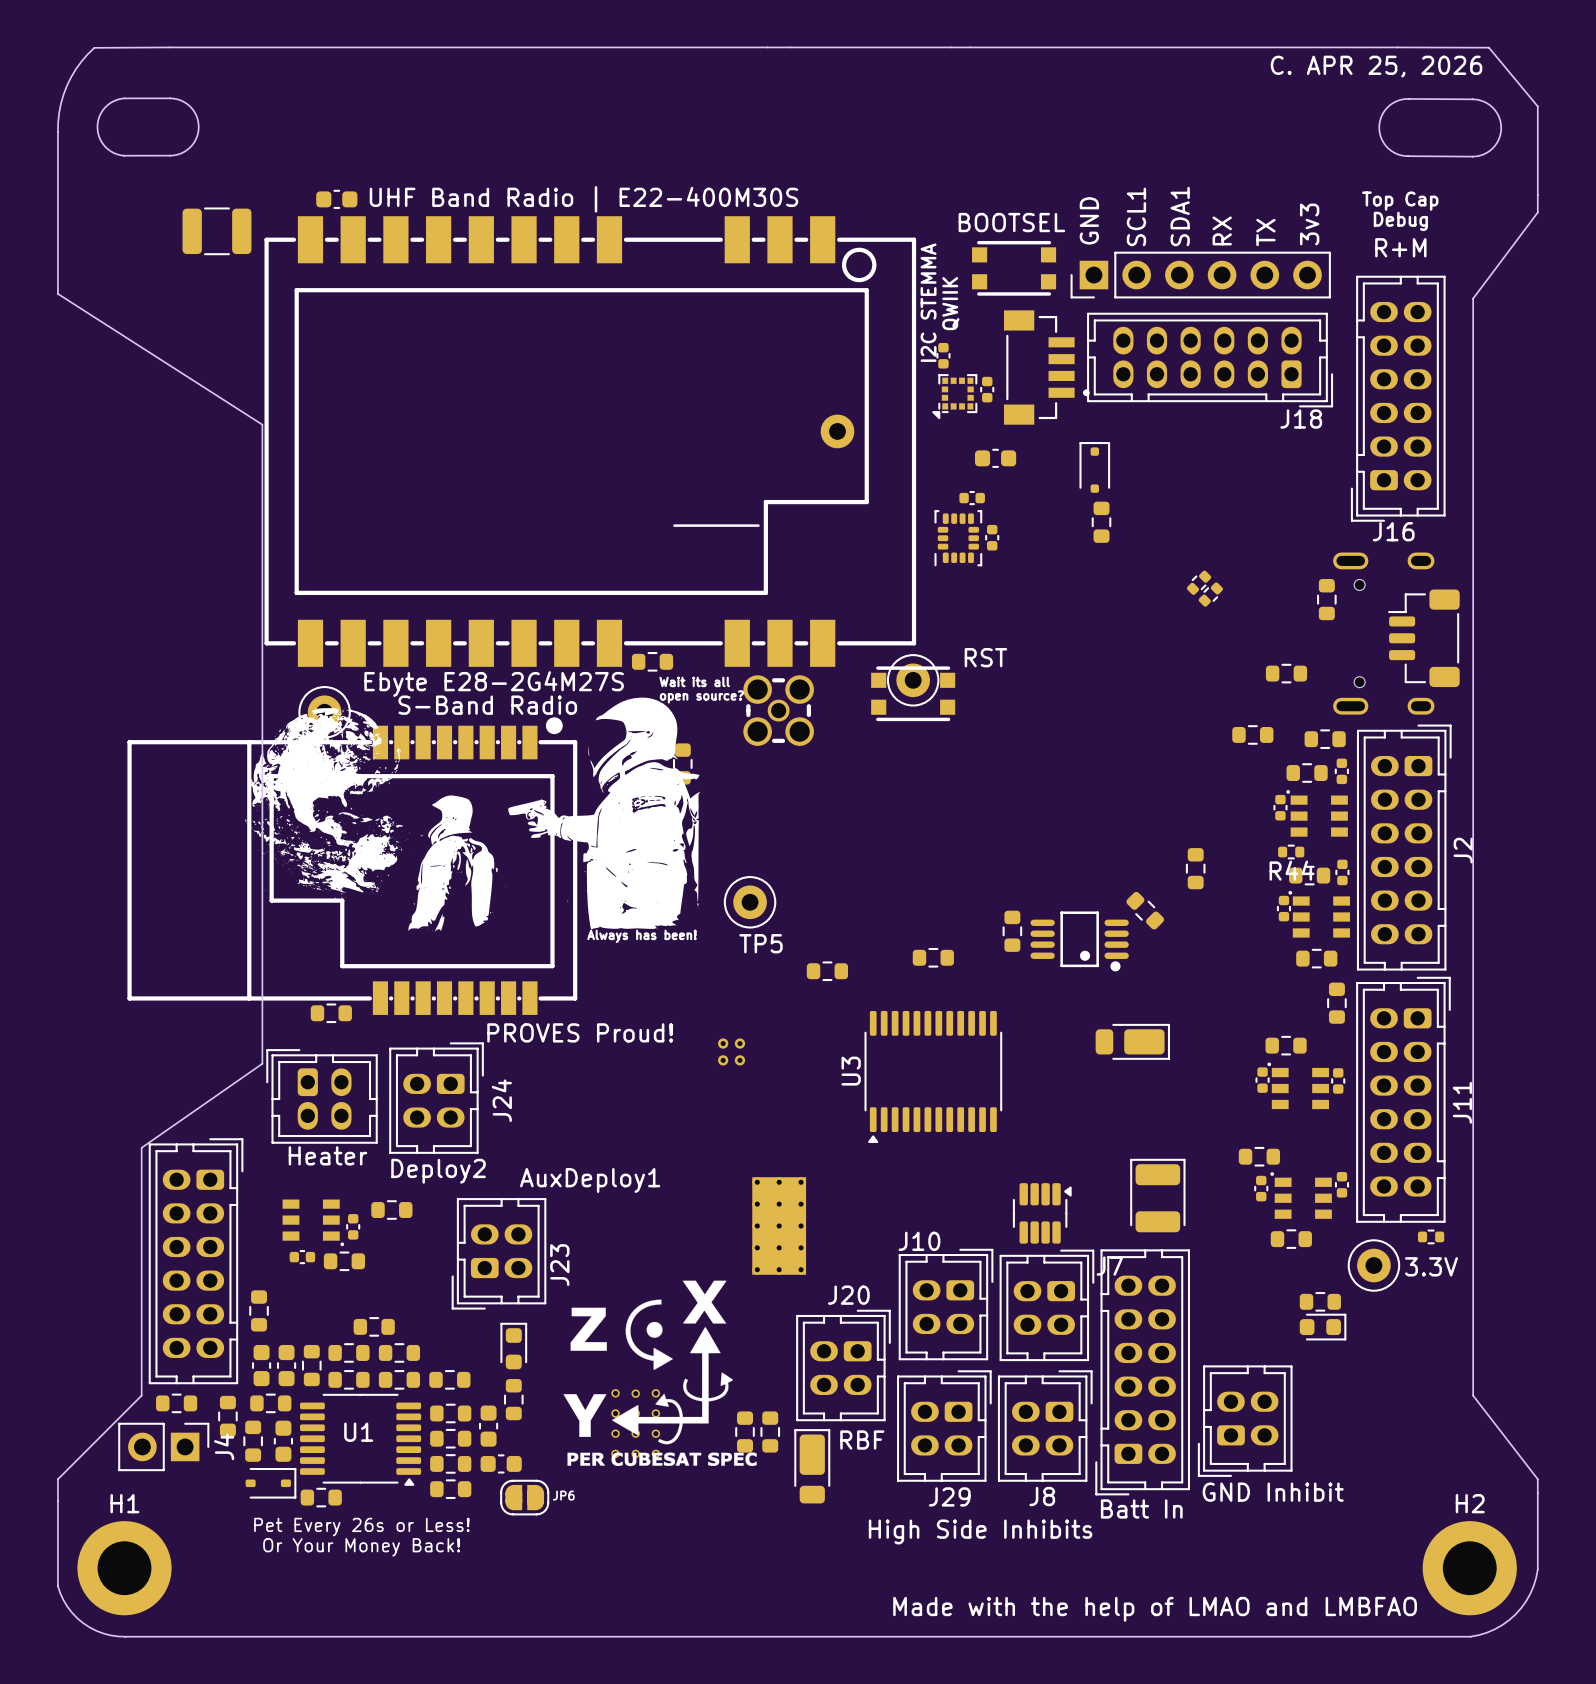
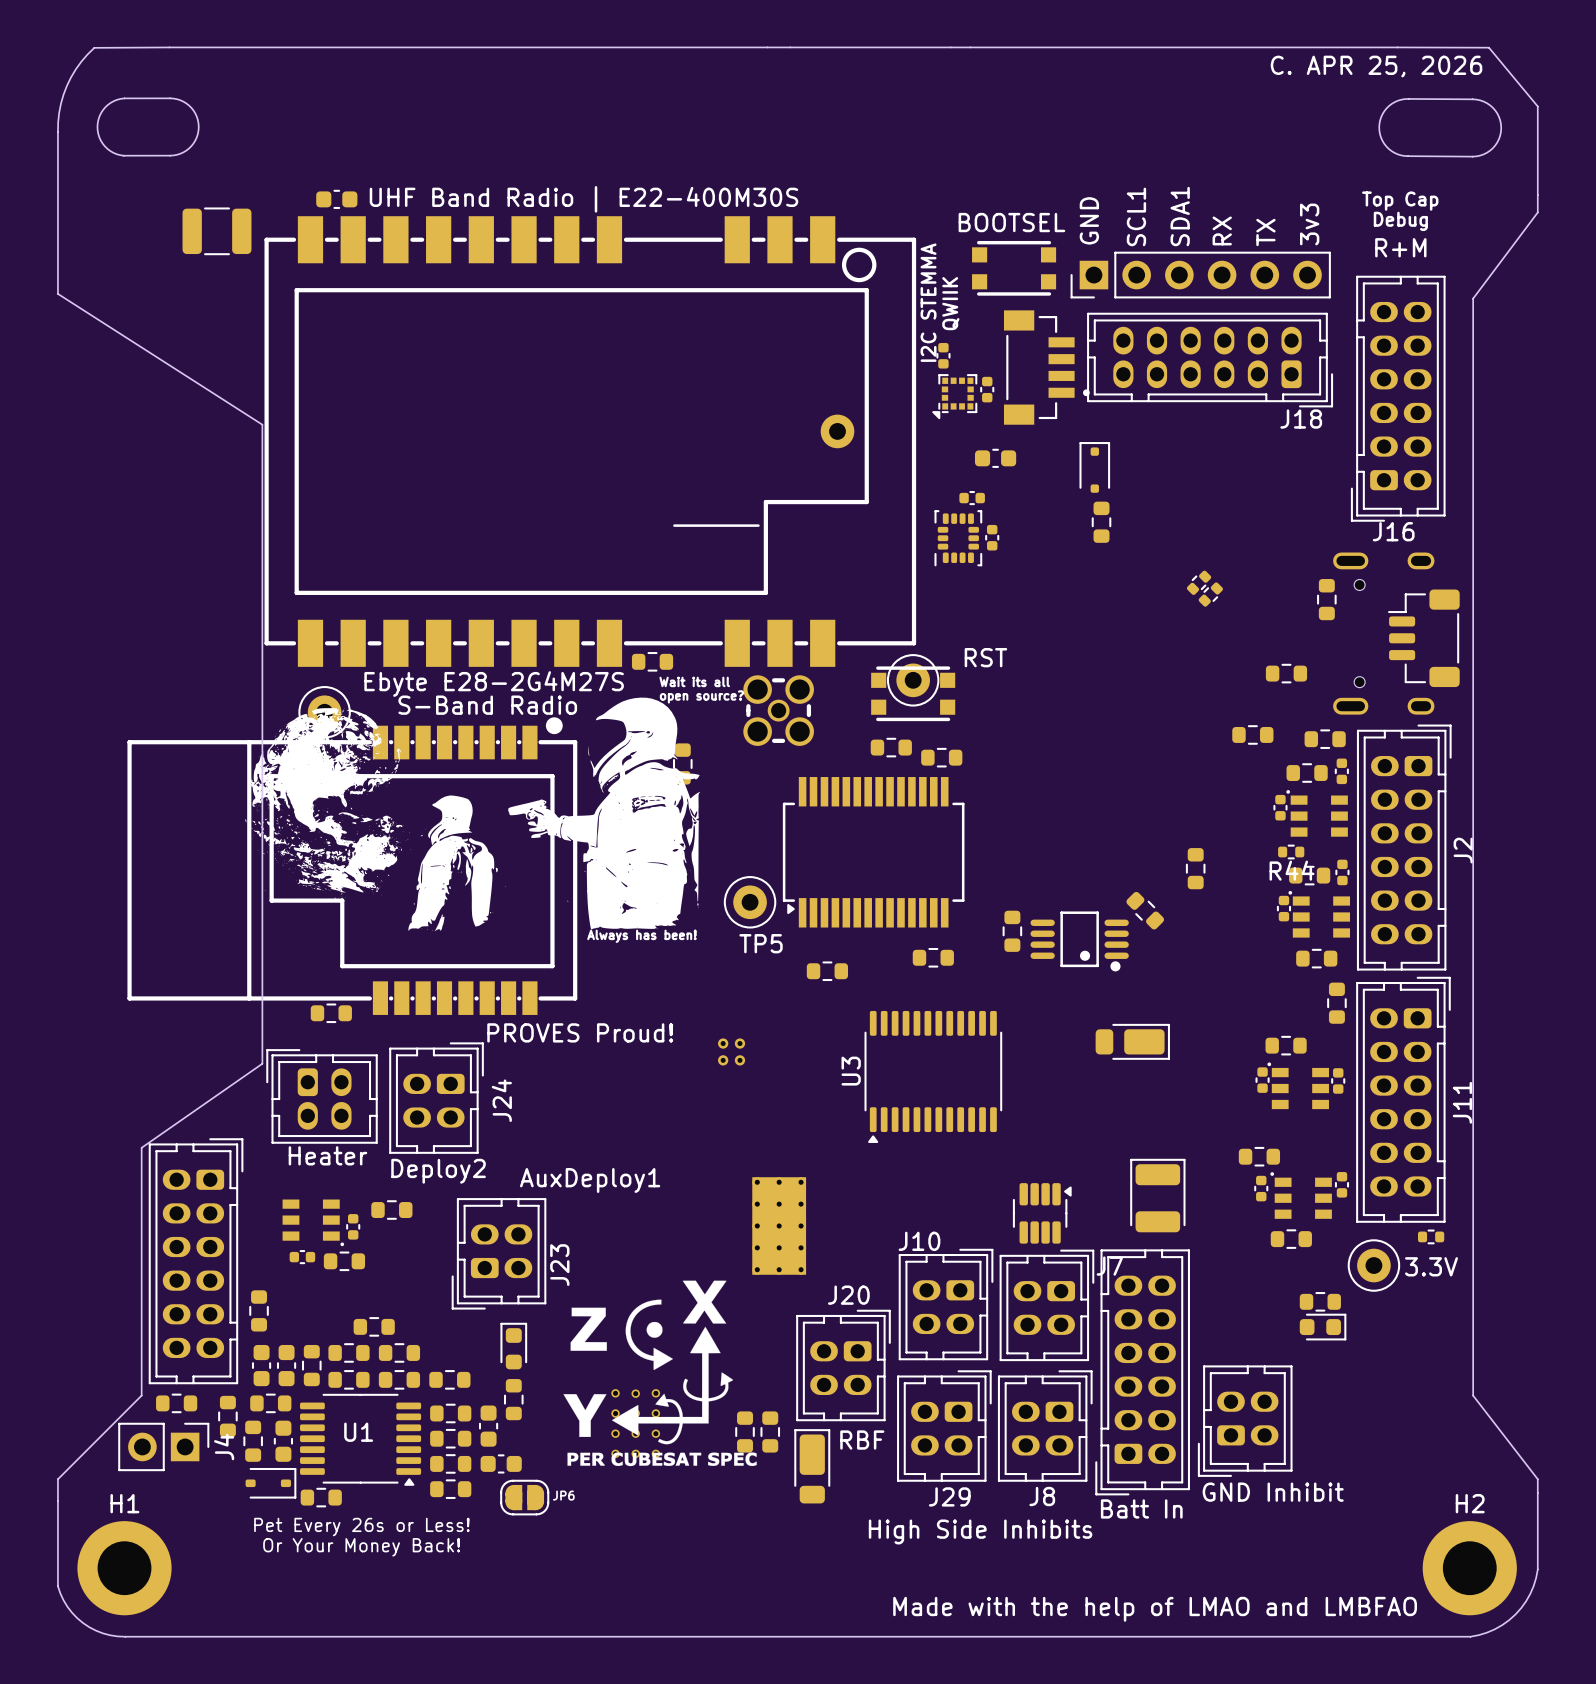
part: none -> (891, 747)
part: none -> (941, 757)
part: none -> (873, 852)

